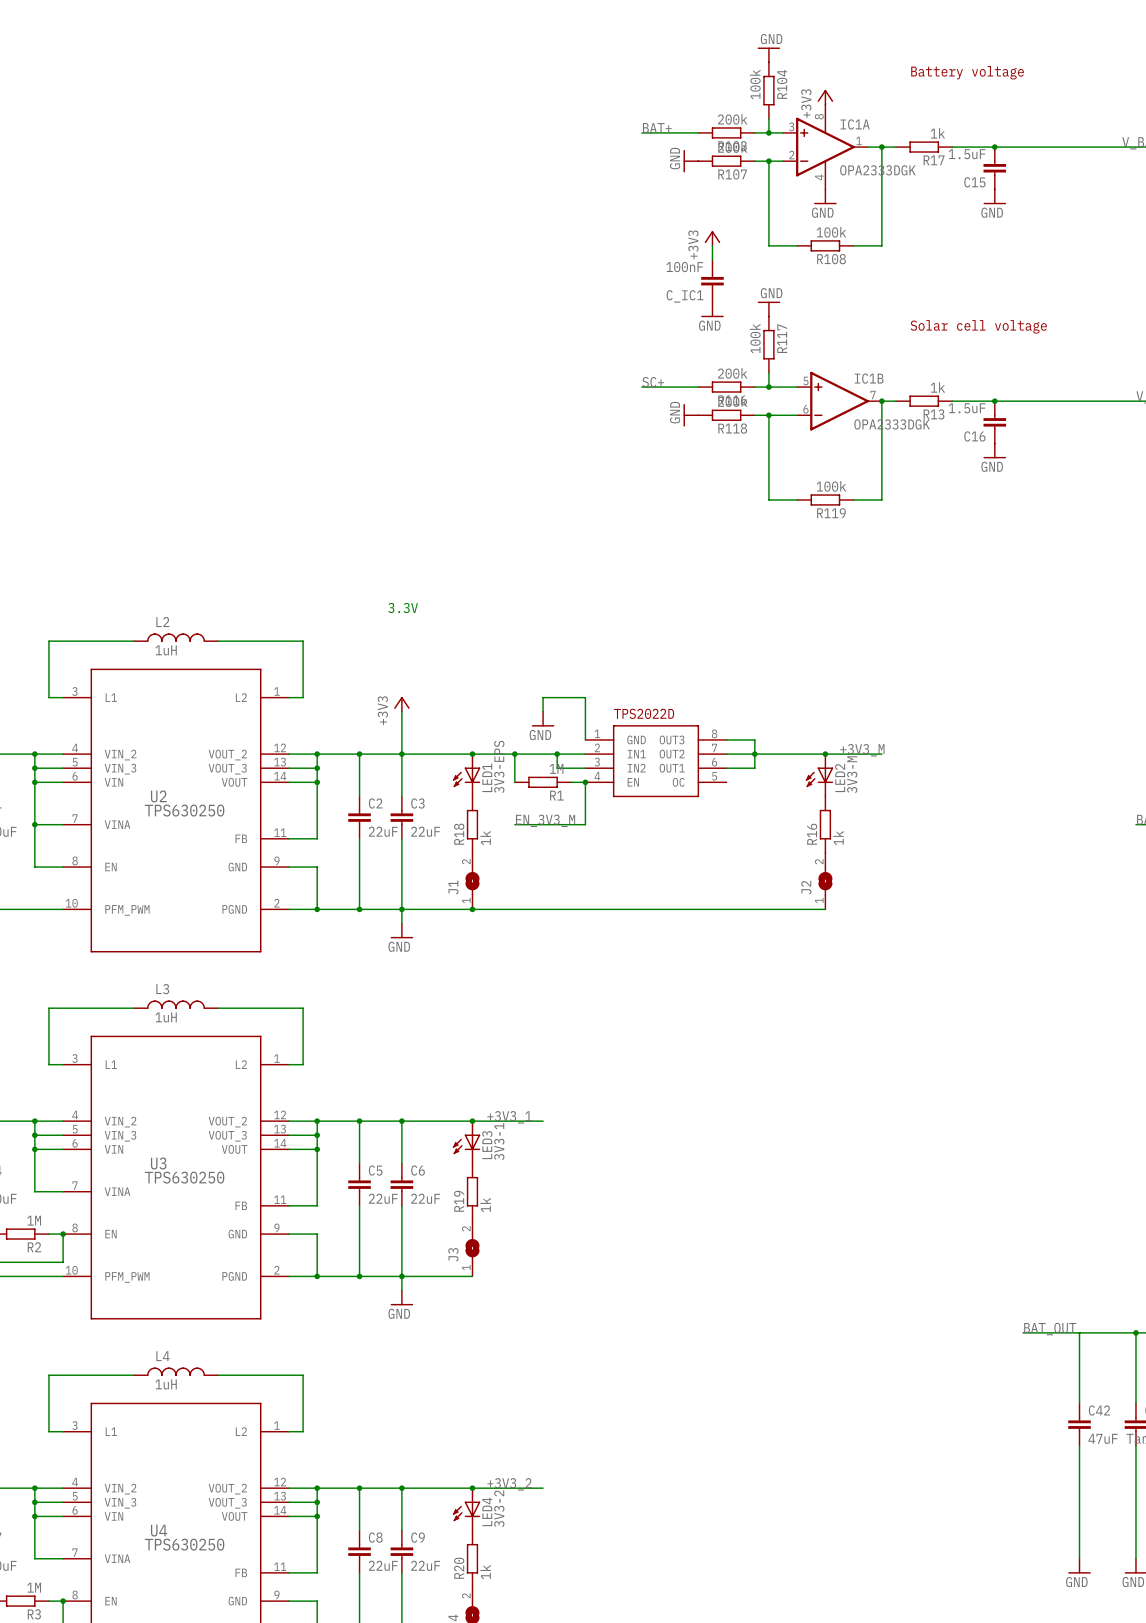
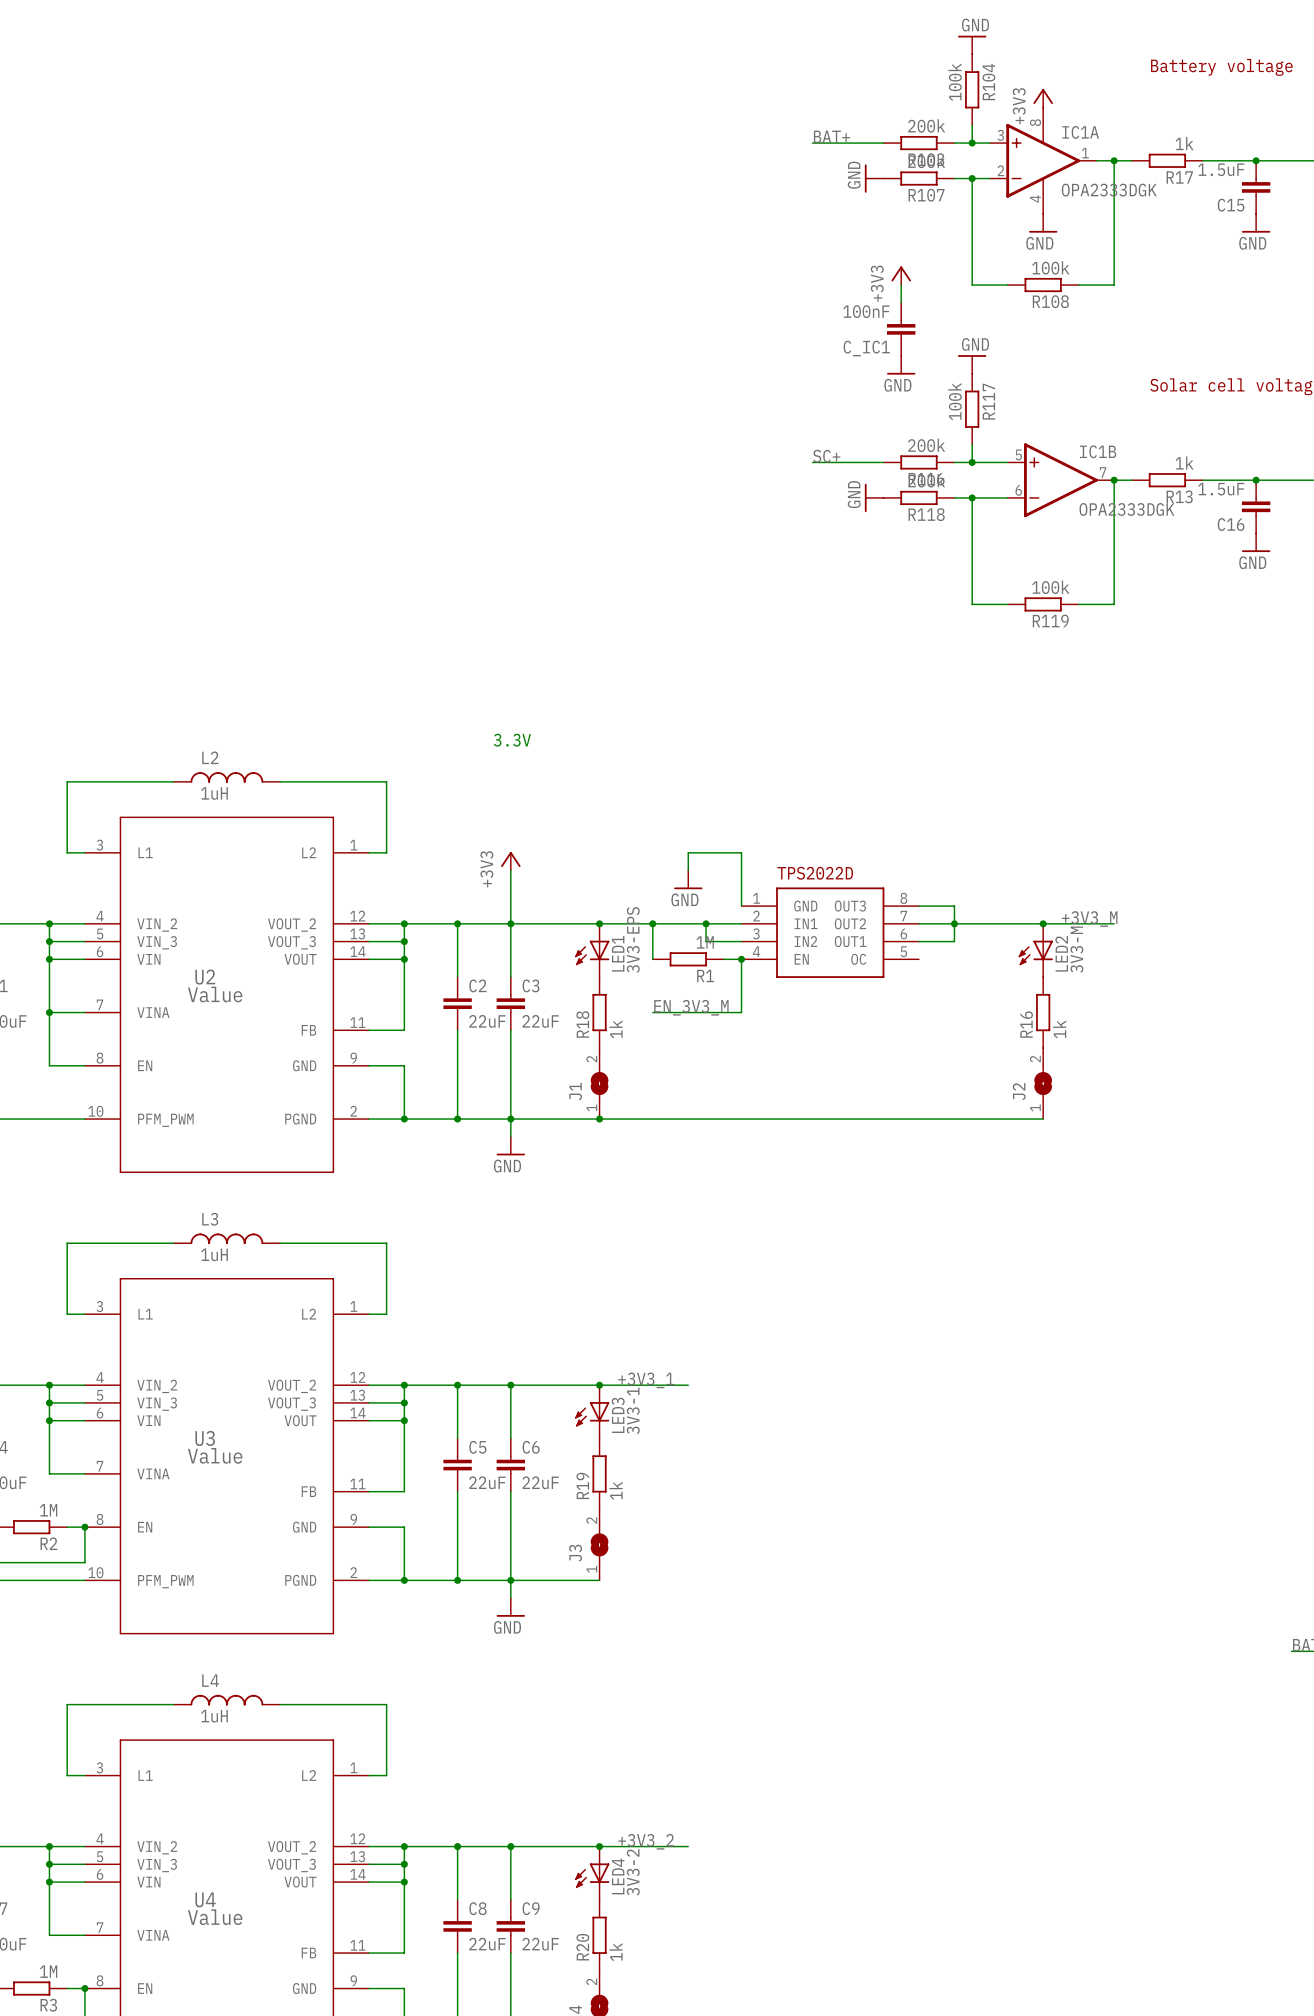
U2 value: TPS630250 (184, 810) -> Value (215, 994)
U3 value: TPS630250 (184, 1177) -> Value (215, 1455)
U4 value: TPS630250 (184, 1544) -> Value (215, 1917)

